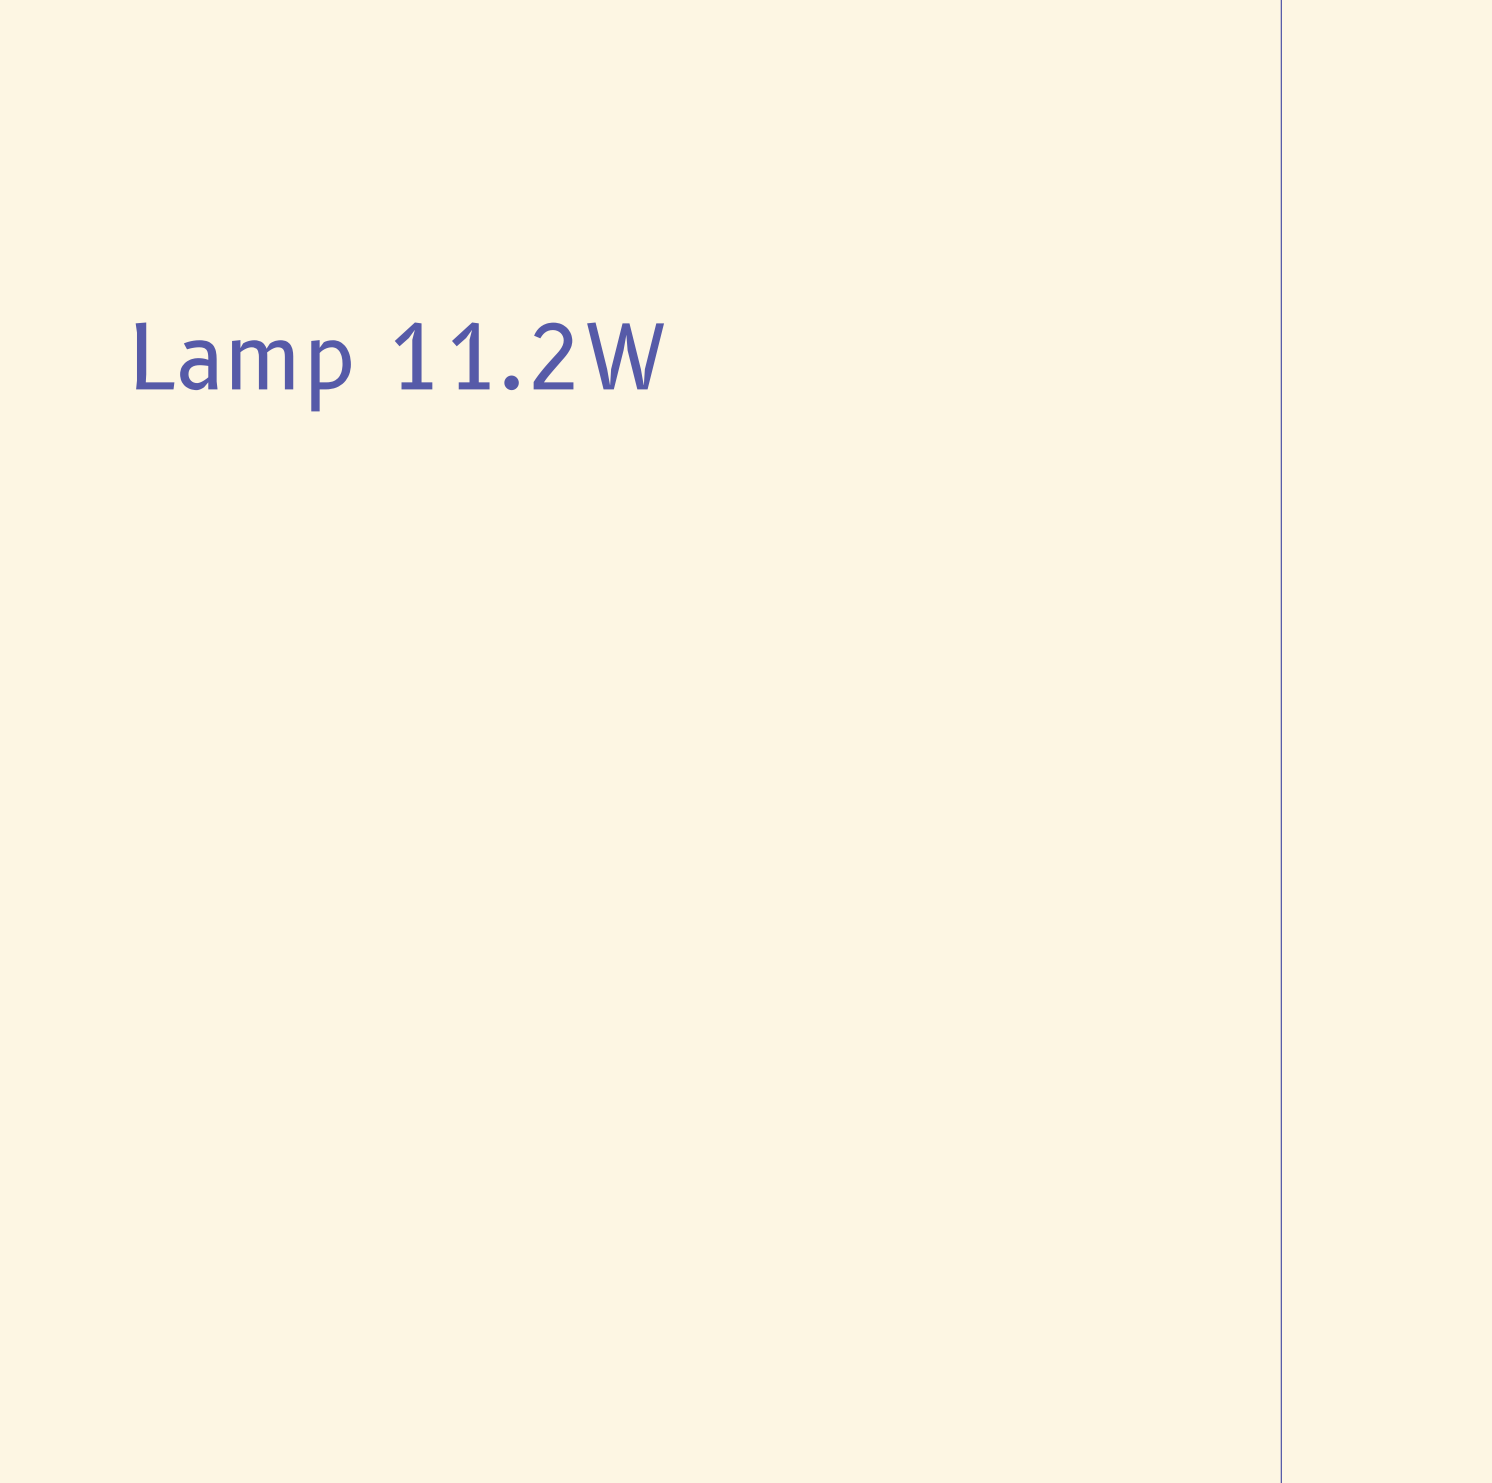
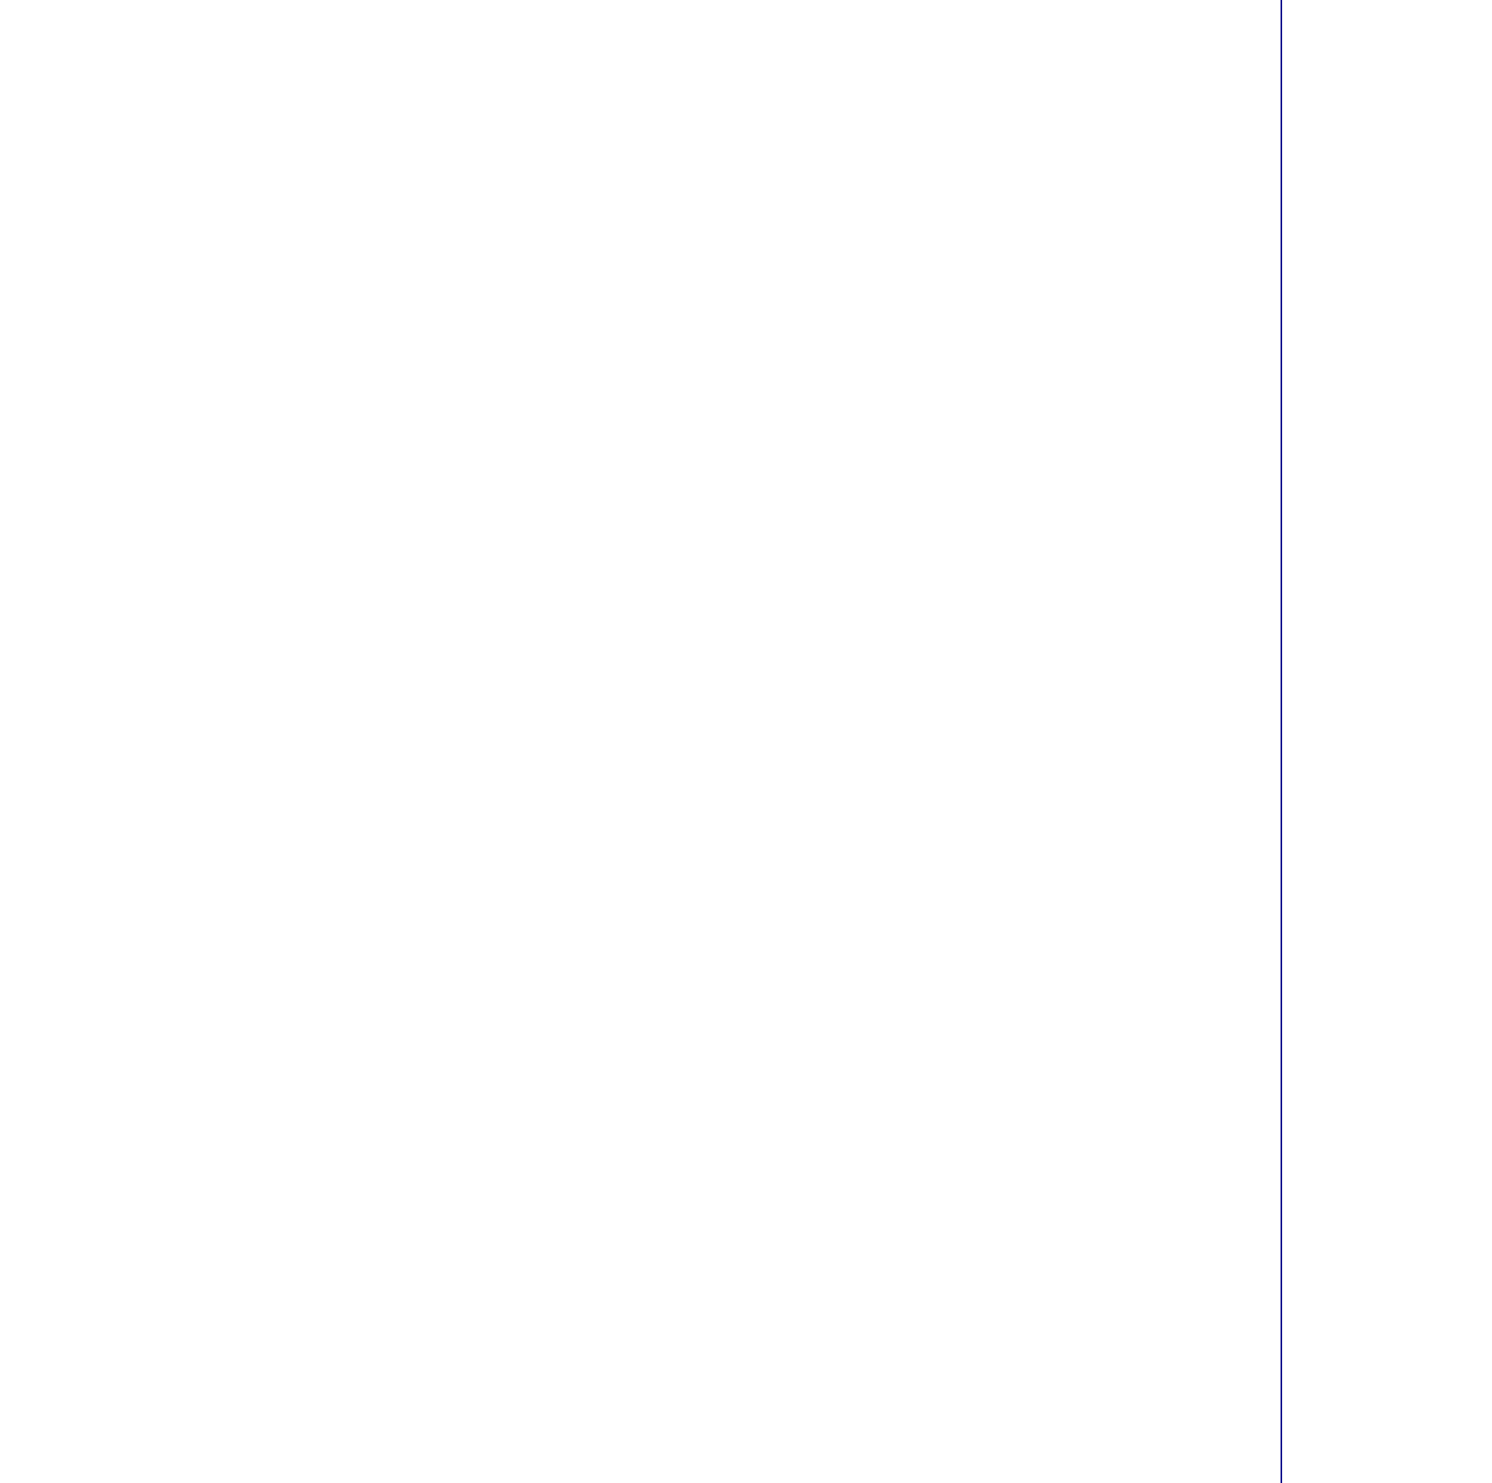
text: Lamp 11.2W (399, 366) -> none

